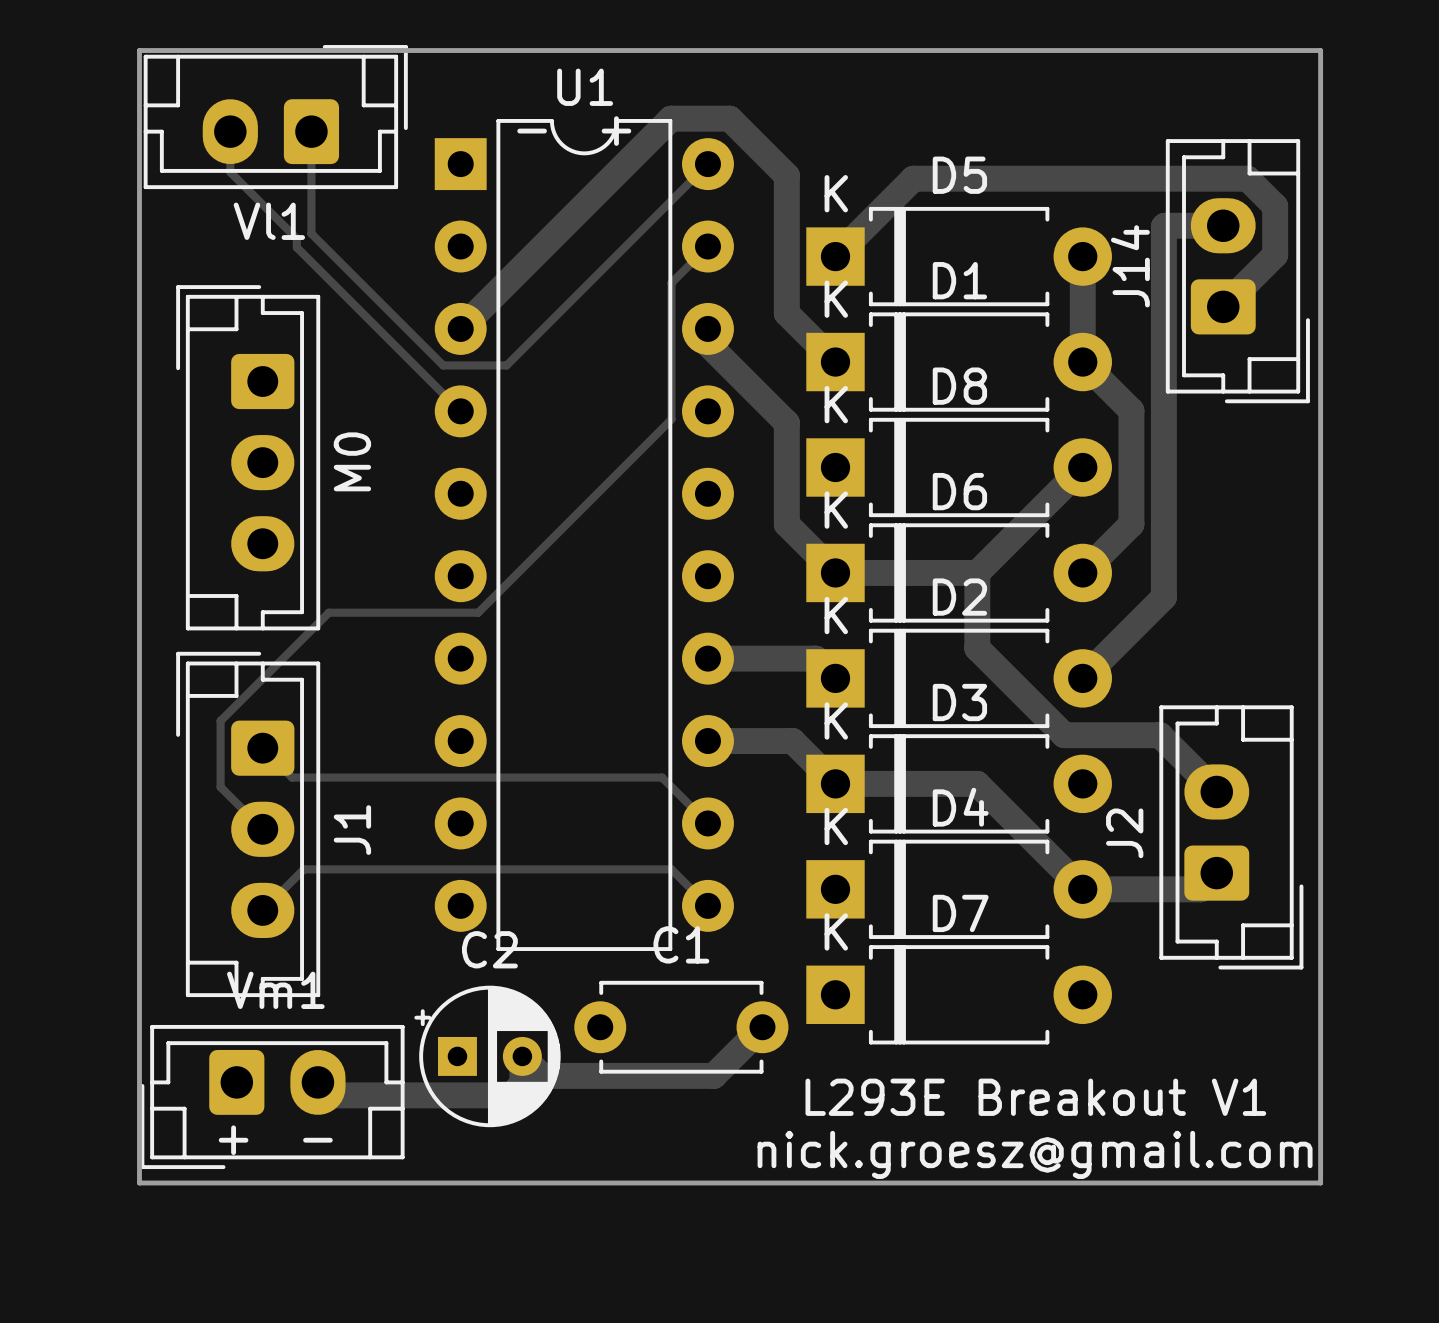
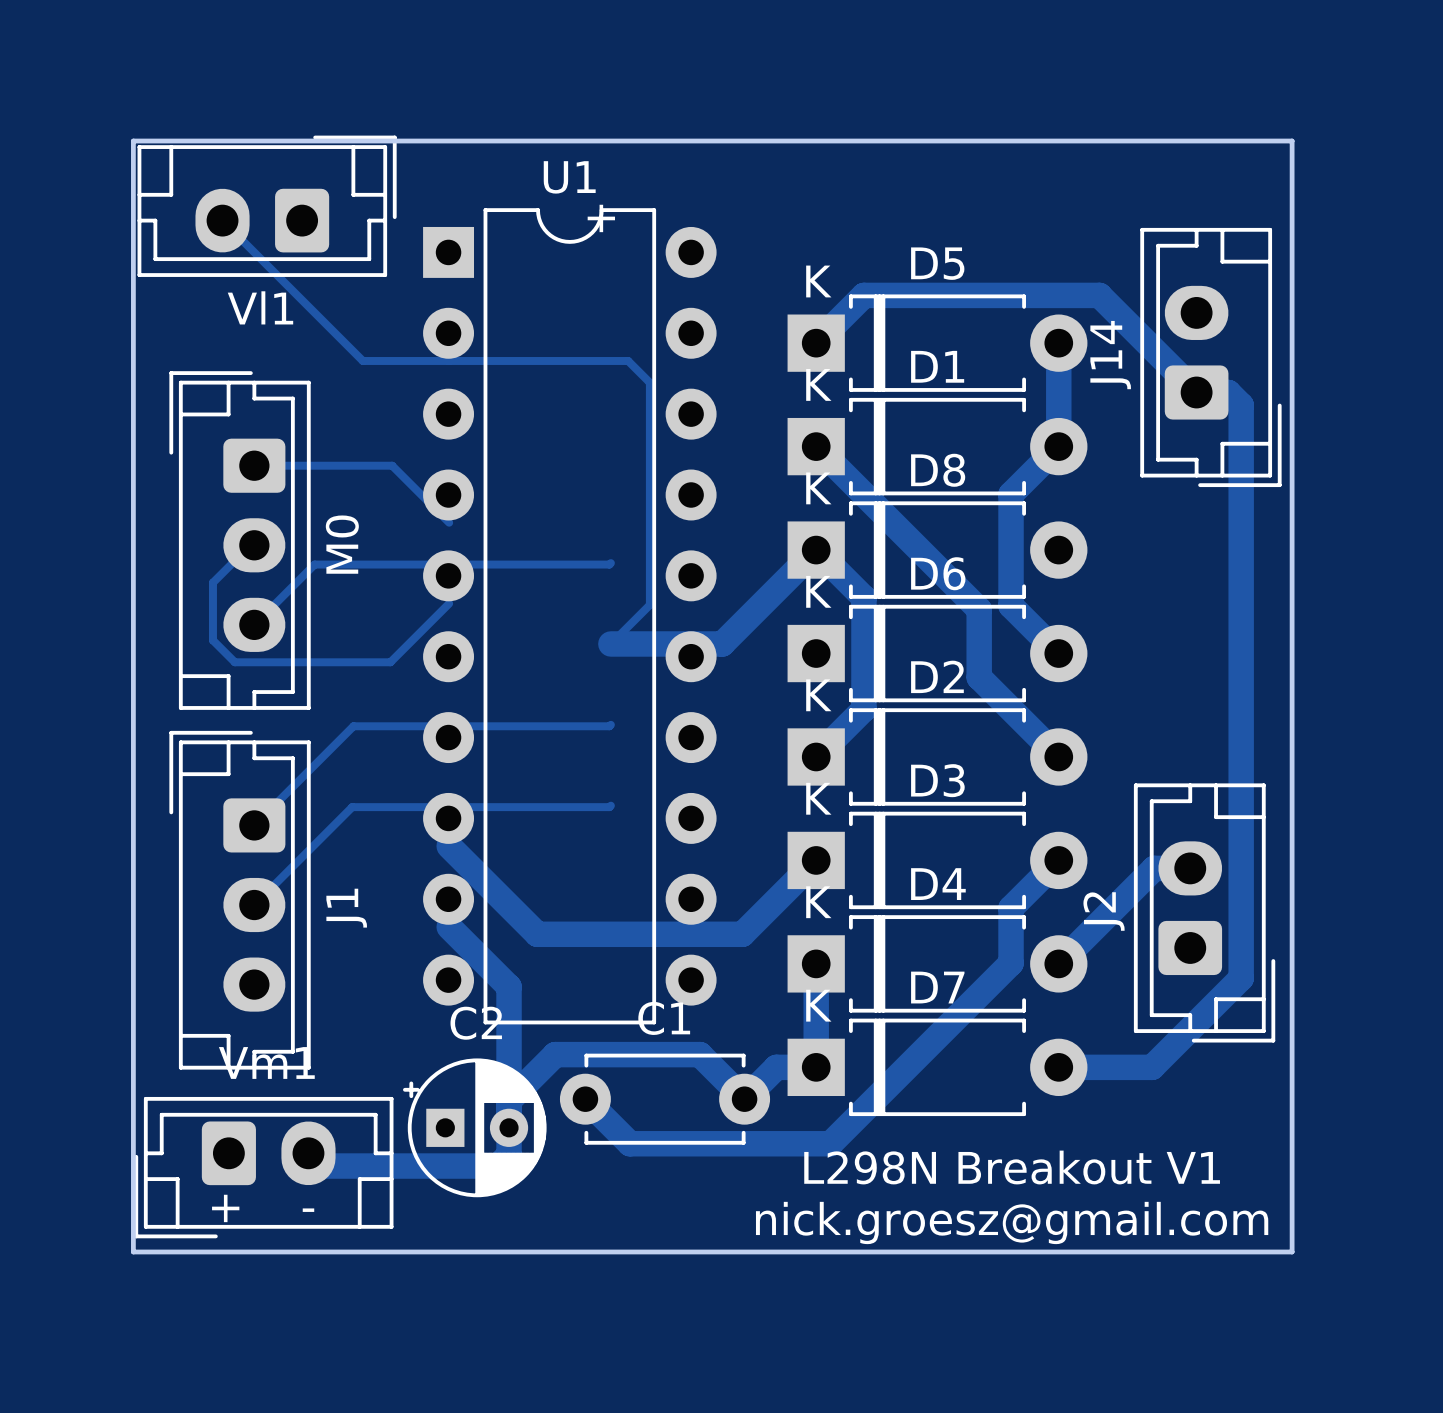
track: (230, 131) (230, 172) (296, 238) (296, 247) (460, 411) -> (222, 220) (362, 360) (628, 360) (649, 382) (649, 604) (610, 643) (722, 643) (816, 550) (863, 597) (863, 709) (816, 756)
track: (311, 131) (311, 233) (443, 365) (506, 365) (707, 164) -> none
text: - (532, 131) -> none
track: (884, 207) (913, 178) (1247, 178) (1275, 206) (1275, 254) (1223, 306) -> (863, 295) (1099, 295) (1196, 392) (1228, 392) (1241, 405) (1241, 978) (1152, 1067) (1058, 1067)
track: (1223, 225) (1163, 226) (1163, 597) (1082, 678) -> (816, 446) (979, 609) (979, 677) (1058, 756)
track: (707, 246) (671, 283) (671, 419) (478, 612) (328, 612) (220, 720) (220, 787) (262, 829) -> (610, 805) (352, 807) (254, 905)
track: (460, 328) (670, 118) (729, 118) (786, 175) (786, 313) (835, 362) -> none
track: (707, 328) (707, 344) (786, 422) (786, 524) (835, 572) (977, 572) -> none
track: (1082, 362) (1131, 410) (1131, 524) (1082, 572) -> (1058, 446) (1011, 494) (1011, 605) (1058, 653)
track: none -> (254, 465) (392, 465) (449, 522)
track: none -> (254, 545) (250, 545) (212, 582) (212, 640) (234, 662) (390, 662) (449, 603)
track: (1082, 467) (977, 572) -> none
track: none -> (610, 563) (314, 564) (254, 624)
track: (977, 572) (977, 648) (1064, 735) (1159, 735) (1216, 791) -> (1058, 963) (1154, 868) (1190, 868)
track: (707, 658) (815, 658) (835, 678) -> none
track: (707, 741) (792, 741) (835, 783) (977, 783) (1082, 889) (1200, 889) (1216, 873) -> none
track: (262, 748) (292, 777) (662, 777) (707, 823) -> (254, 825) (353, 726) (610, 724)
track: none -> (449, 846) (537, 934) (742, 934) (816, 860)
track: none -> (1058, 860) (1011, 908) (1011, 963) (830, 1143) (629, 1143) (585, 1099)
track: none -> (816, 963) (816, 1067) (776, 1067) (744, 1099) (700, 1054) (555, 1054) (509, 1100)
track: (707, 905) (671, 869) (303, 869) (262, 910) -> none
track: (762, 1027) (713, 1075) (541, 1075) (522, 1056) -> (449, 926) (509, 986) (509, 1127)
text: L293E Breakout V1 (1035, 1097) -> L298N Breakout V1 (1012, 1167)

